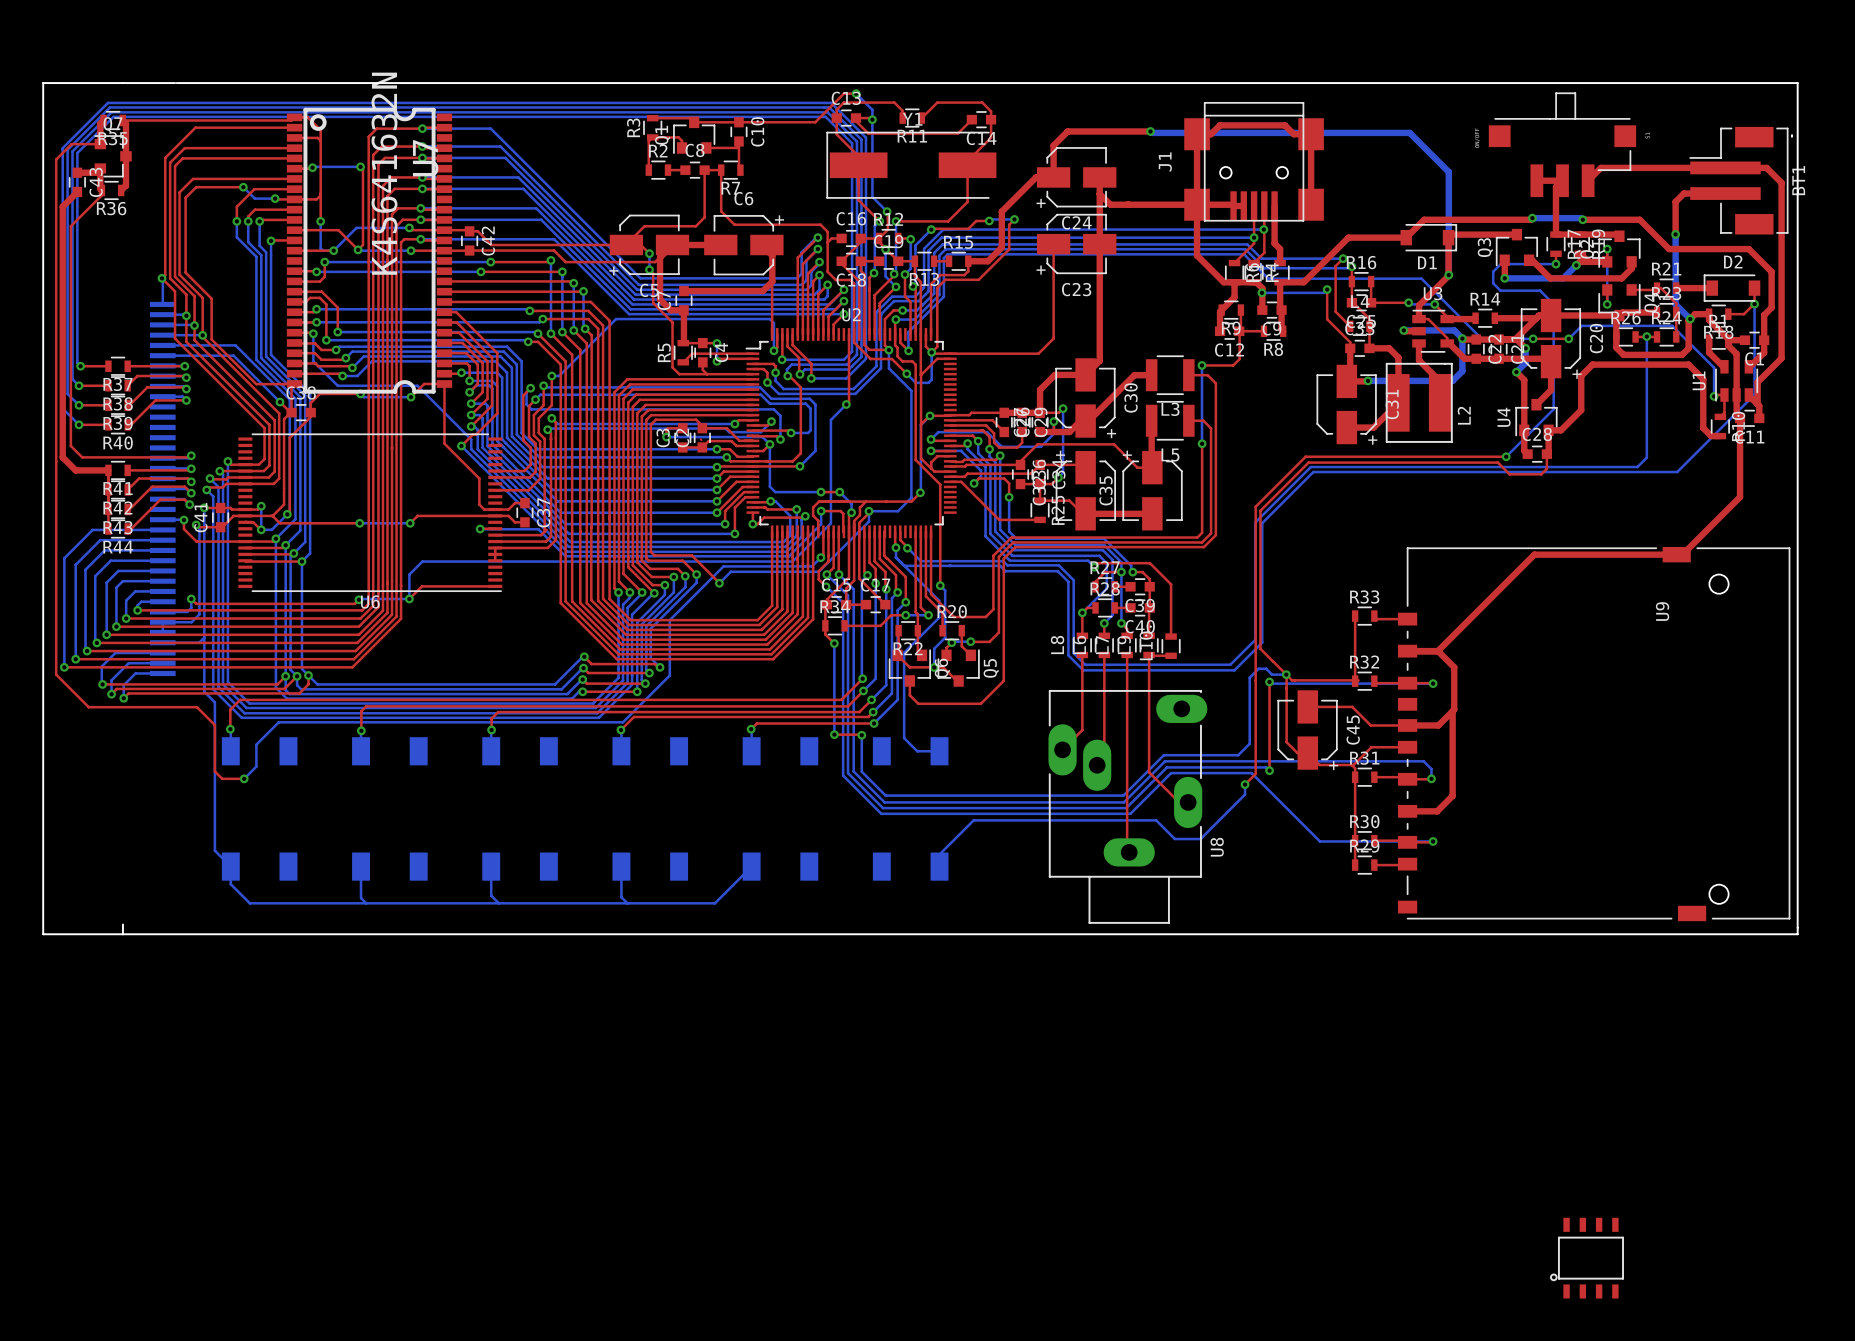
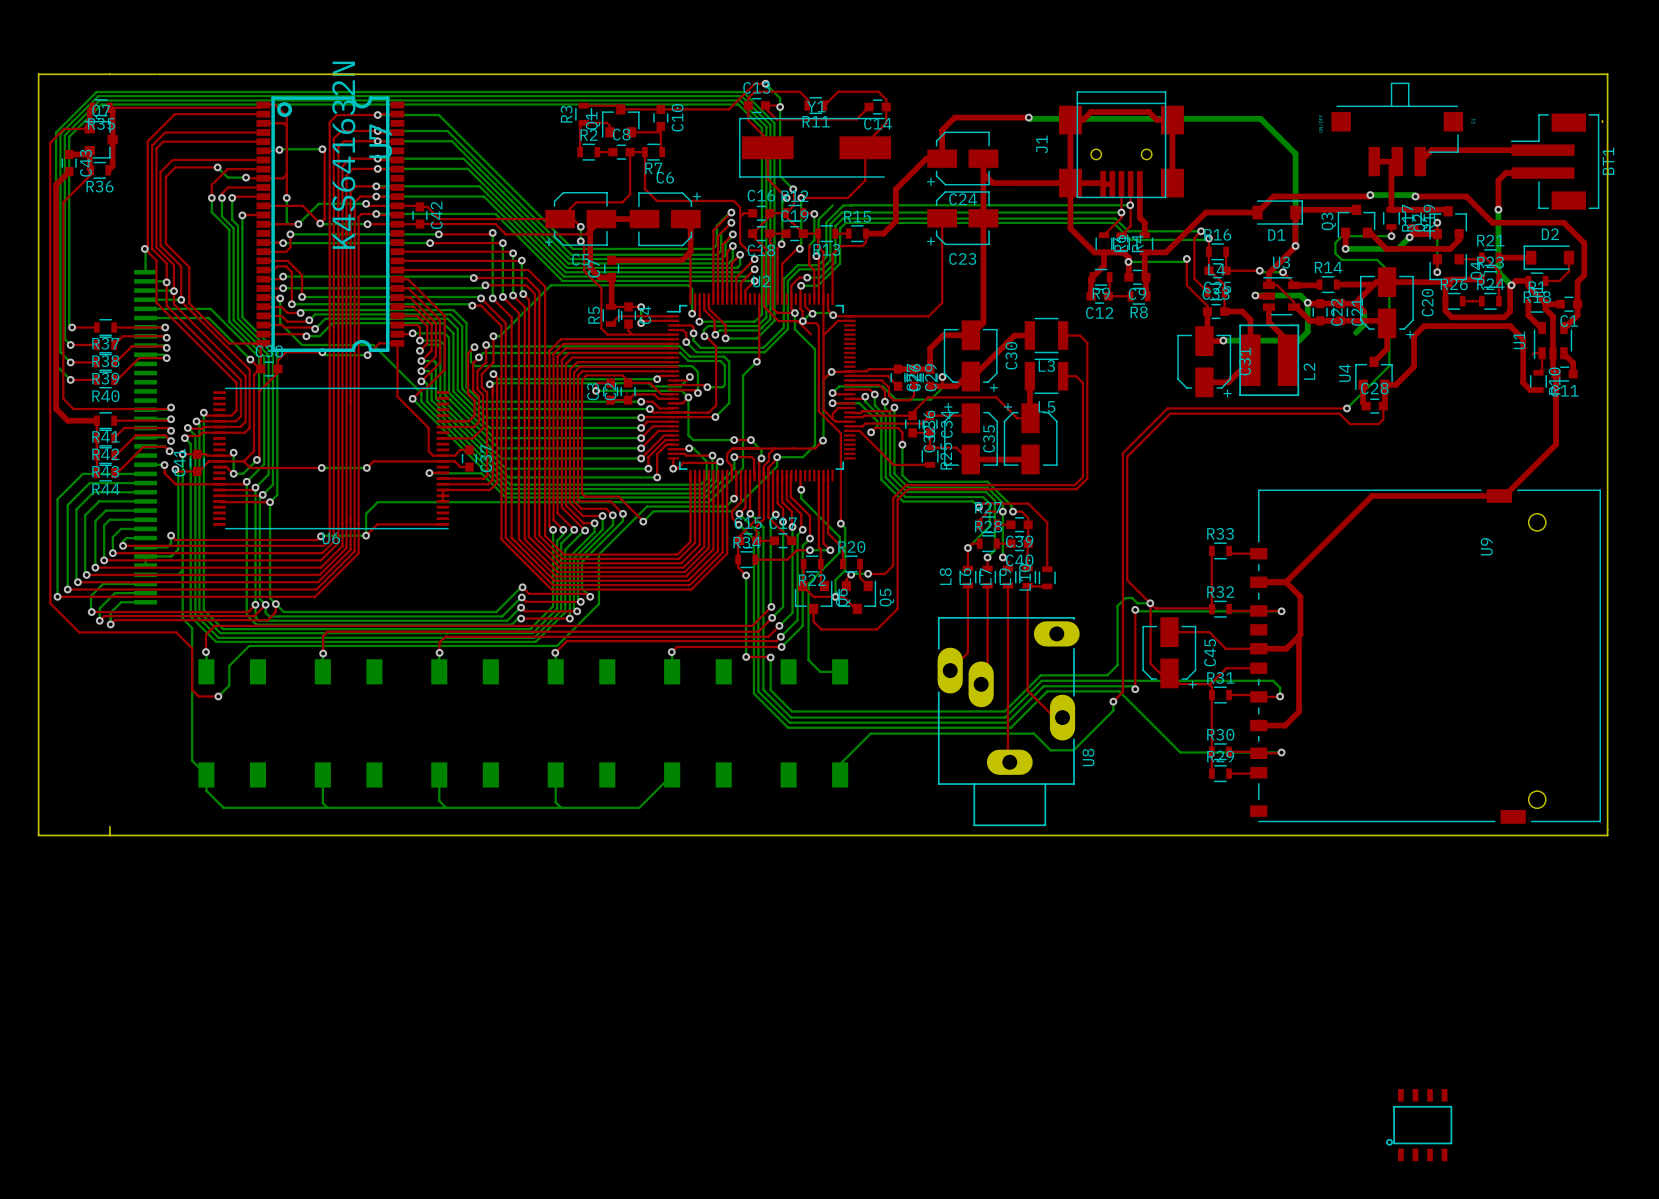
top track: (1725, 167) (1766, 167) (1781, 182) (1781, 358) (1757, 382) (1757, 404) -> none
top track: (1014, 219) (1009, 224) (1009, 249) (978, 279) (945, 279) (937, 287) (937, 346) (931, 352) -> none
bottom track: (1014, 219) (989, 221) -> none
via: (1014, 219) -> none
top track: (989, 221) (976, 221) (968, 228) (931, 229) -> none
via: (989, 221) -> none
via: (931, 229) -> none
bottom track: (885, 249) (885, 276) (896, 286) -> none
via: (885, 249) -> none
via: (894, 274) -> none
via: (905, 274) -> none
via: none -> (799, 248)
top track: (896, 286) (879, 303) (879, 334) -> none
via: (896, 286) -> none
bottom track: (1754, 304) (1754, 394) (1677, 472) (1313, 472) (1262, 523) (1262, 642) (1234, 670) (1083, 670) (1068, 655) (1068, 581) (1057, 571) (1005, 571) (1000, 565) (904, 565) (896, 557) -> none
via: (1754, 304) -> none
top track: (1239, 331) (1239, 359) (1233, 365) (1201, 365) -> none
bottom track: (1646, 336) (1646, 457) (1637, 467) (1310, 467) (1255, 522) (1255, 639) (1230, 664) (1085, 664) (1073, 653) (1073, 580) (1058, 565) (1007, 565) (1003, 561) (920, 561) (907, 548) -> none
via: (1646, 336) -> none
top track: (1533, 338) (1568, 338) -> none
bottom track: (1533, 338) (1481, 338) (1421, 278) (1268, 278) (1244, 254) (947, 254) (943, 258) (943, 296) (908, 332) (908, 350) -> none
via: (1533, 338) -> none
bottom track: (1568, 338) (1581, 325) (1672, 325) (1714, 367) (1714, 396) -> none
via: (1568, 338) -> none
via: (1525, 348) -> none
bottom track: none -> (831, 313) (810, 313) (802, 321)
bottom track: (931, 352) (931, 379) (928, 382) (915, 382) (906, 373) -> none
bottom track: (1201, 365) (1201, 443) -> none
via: (1201, 365) -> none
top track: (1516, 372) (1524, 379) (1524, 430) -> none
via: (1516, 372) -> none
via position: (906, 373) -> (802, 321)
via: (1714, 396) -> none
top track: (1063, 408) (1058, 412) (1040, 412) -> none
bottom track: (1063, 408) (1063, 472) (1058, 477) -> none
via: (1063, 408) -> none
top track: (1202, 443) (1202, 532) (1197, 537) (1011, 537) (993, 555) (993, 609) (985, 617) (953, 617) (931, 594) (931, 531) -> none
via: (1202, 443) -> none
top track: (1058, 477) (1051, 484) (1040, 484) -> none
via: (1058, 477) -> none
top track: (900, 531) (900, 540) (907, 548) -> none
via: (907, 548) -> none

